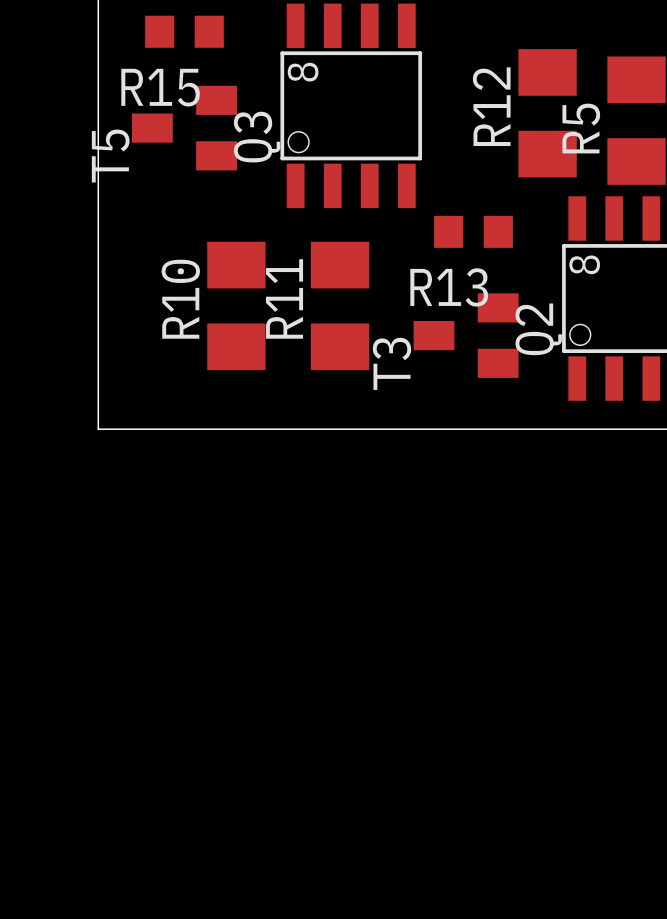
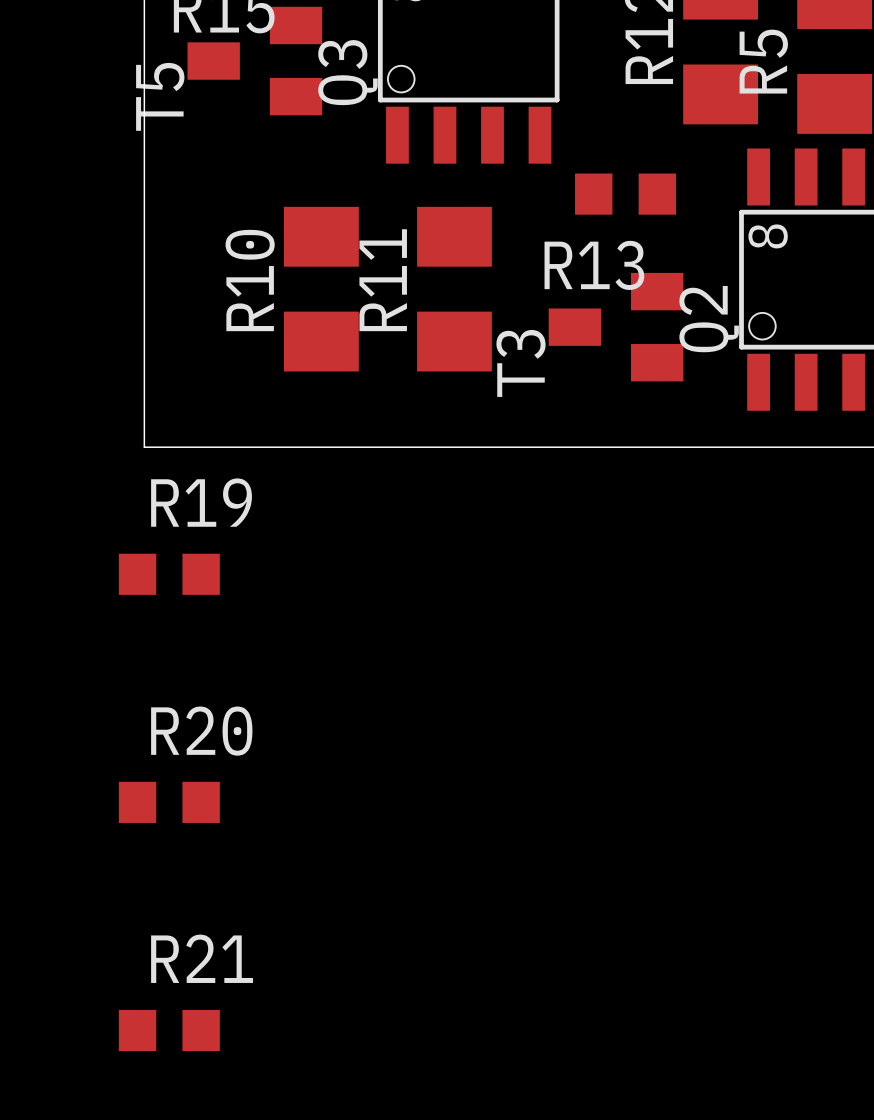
R19: none -> (169, 574)
R20: none -> (169, 802)
R21: none -> (169, 1030)

